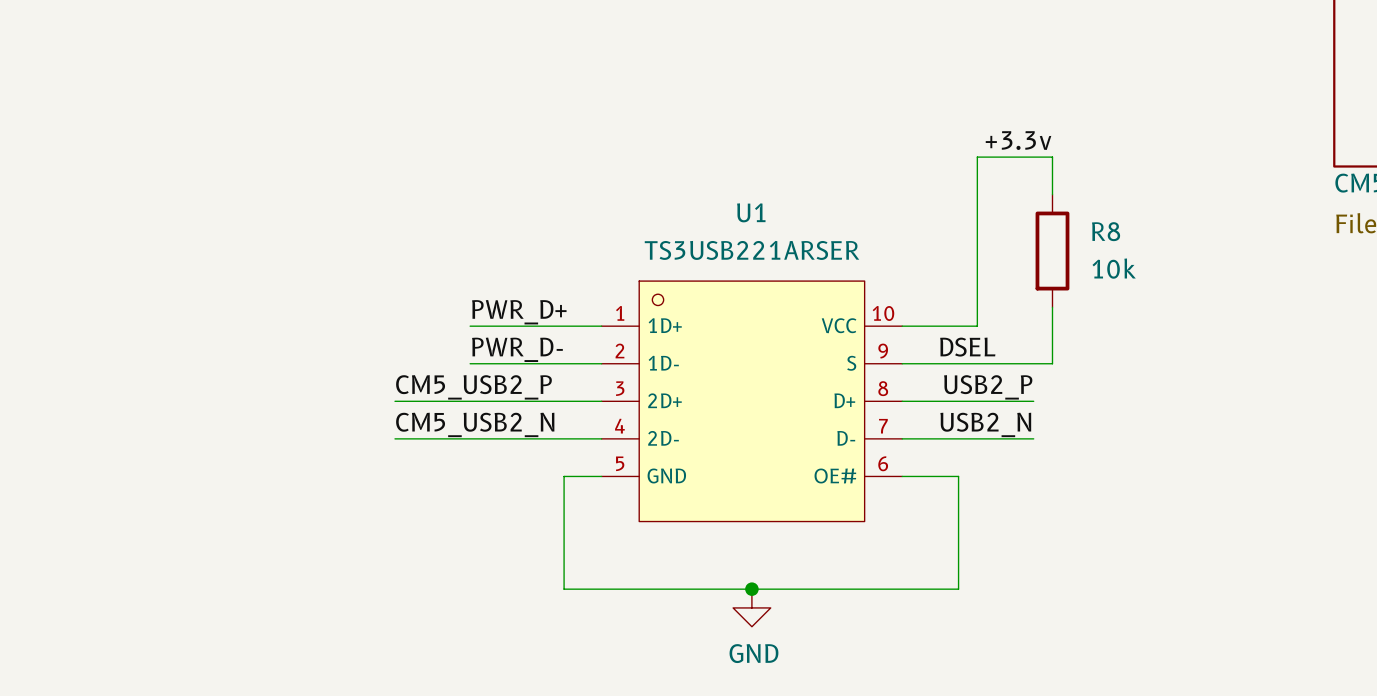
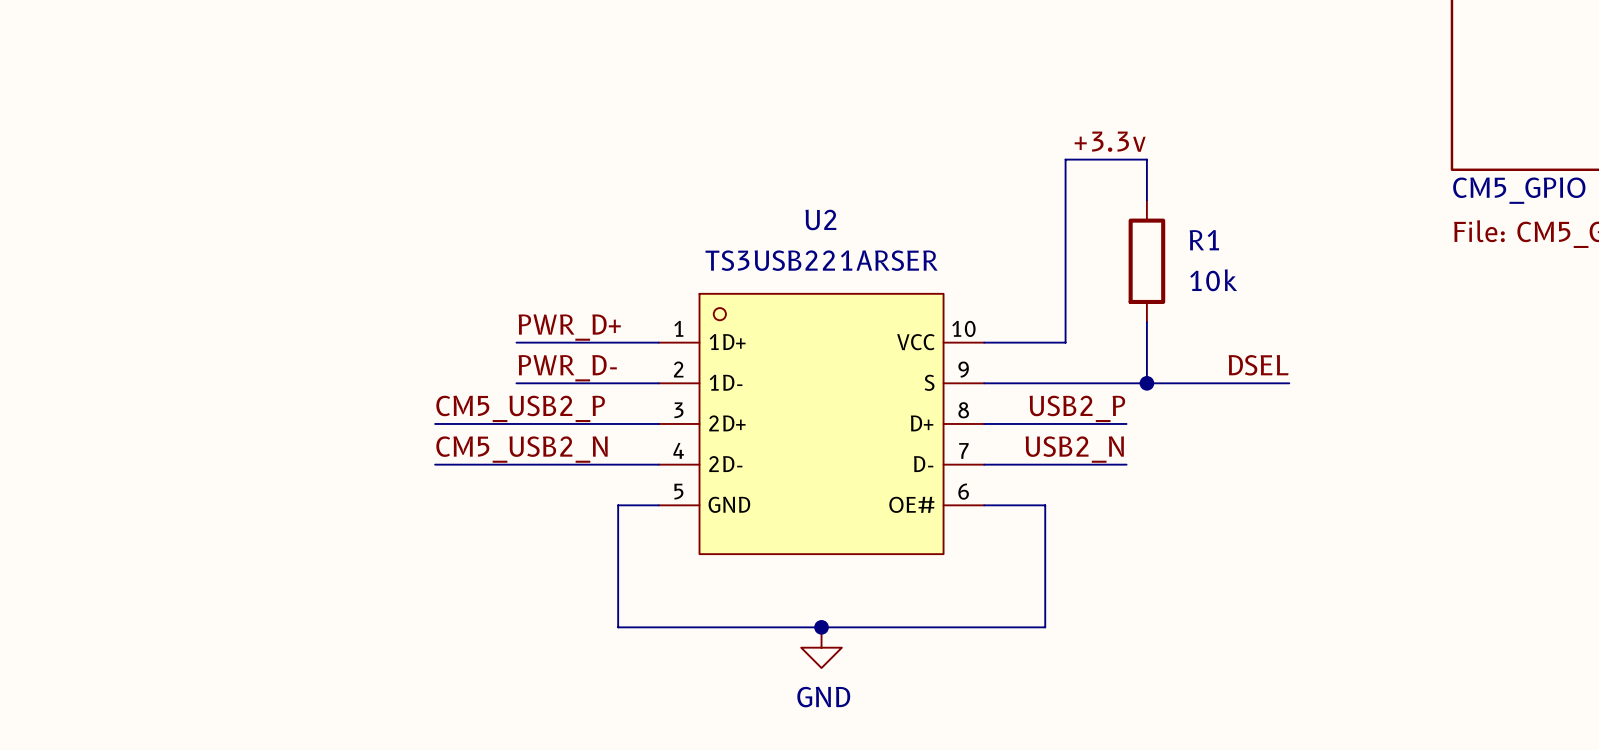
U1 name: U1 (751, 212) -> U2 (820, 219)
R8 name: R8 (1106, 231) -> R1 (1204, 240)
label position: DSEL (967, 347) -> DSEL (1258, 365)
wire: none -> (1146, 383) (1289, 383)
junction: none -> (1146, 383)

